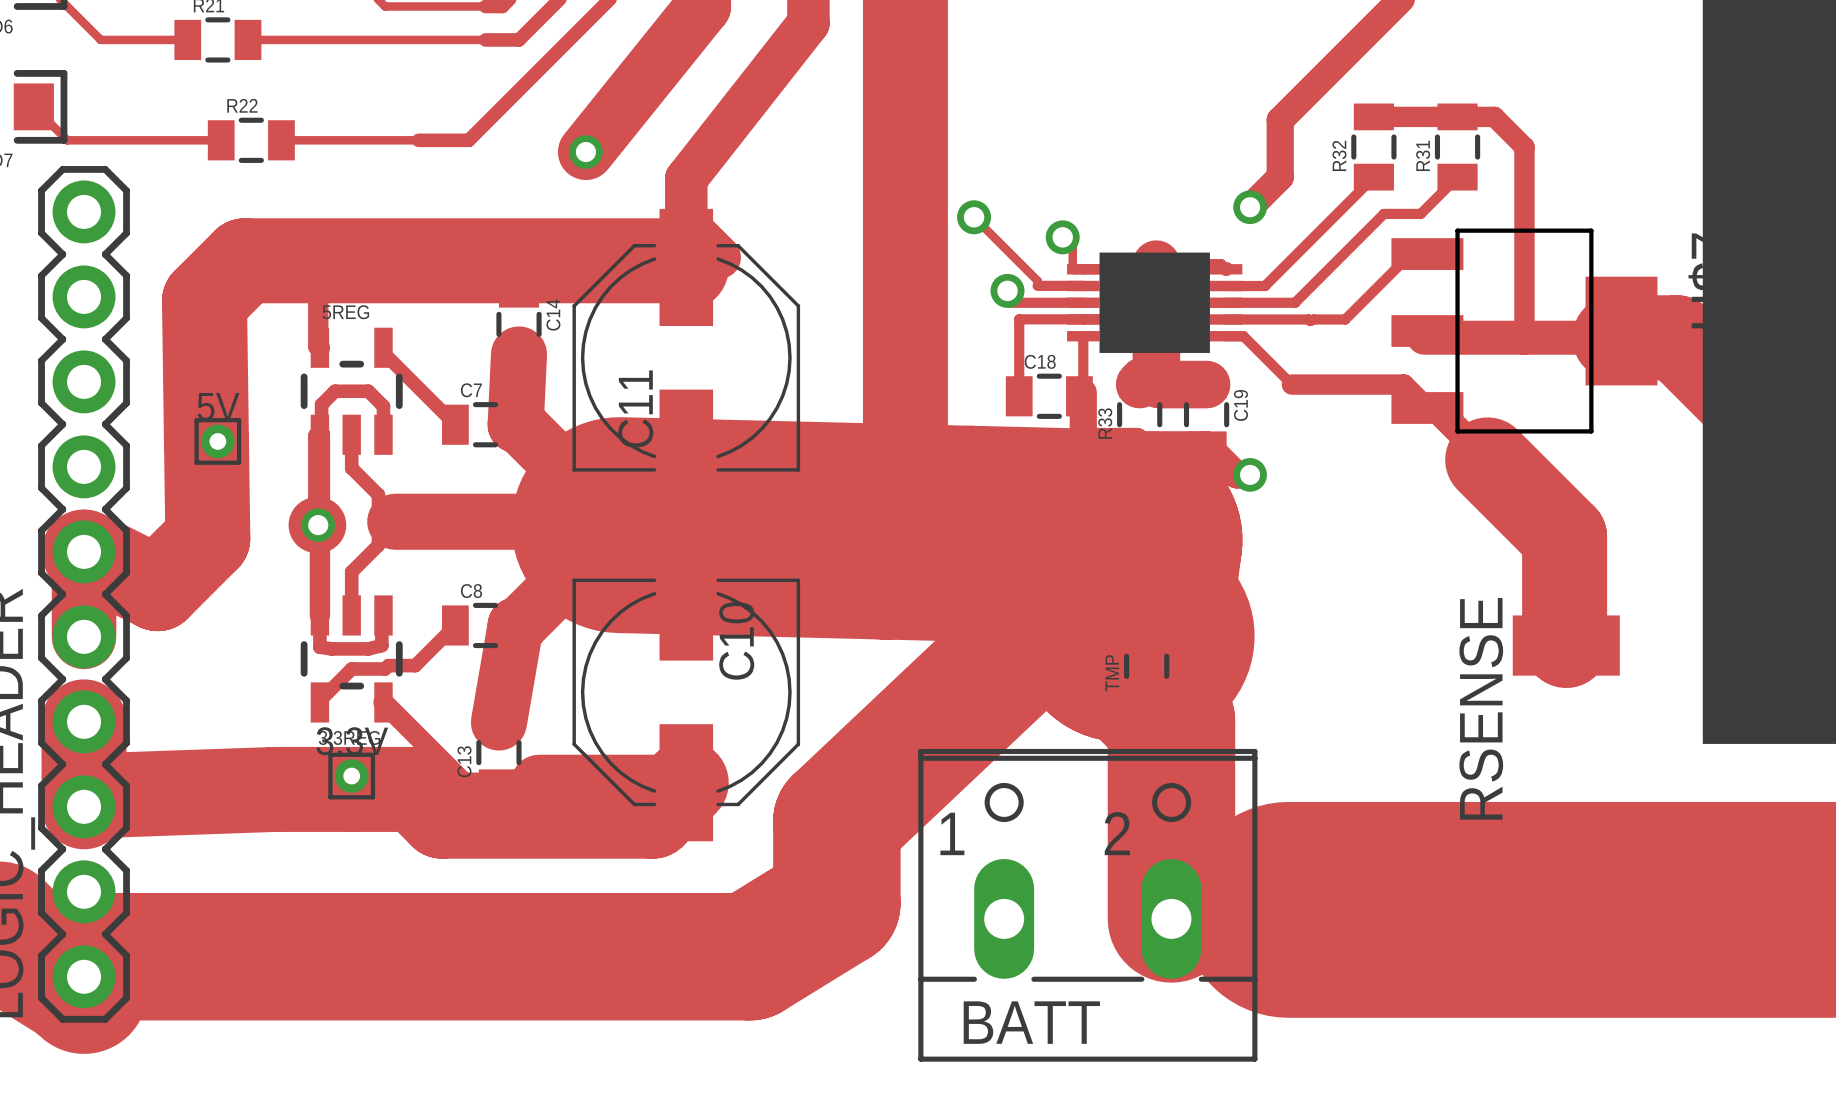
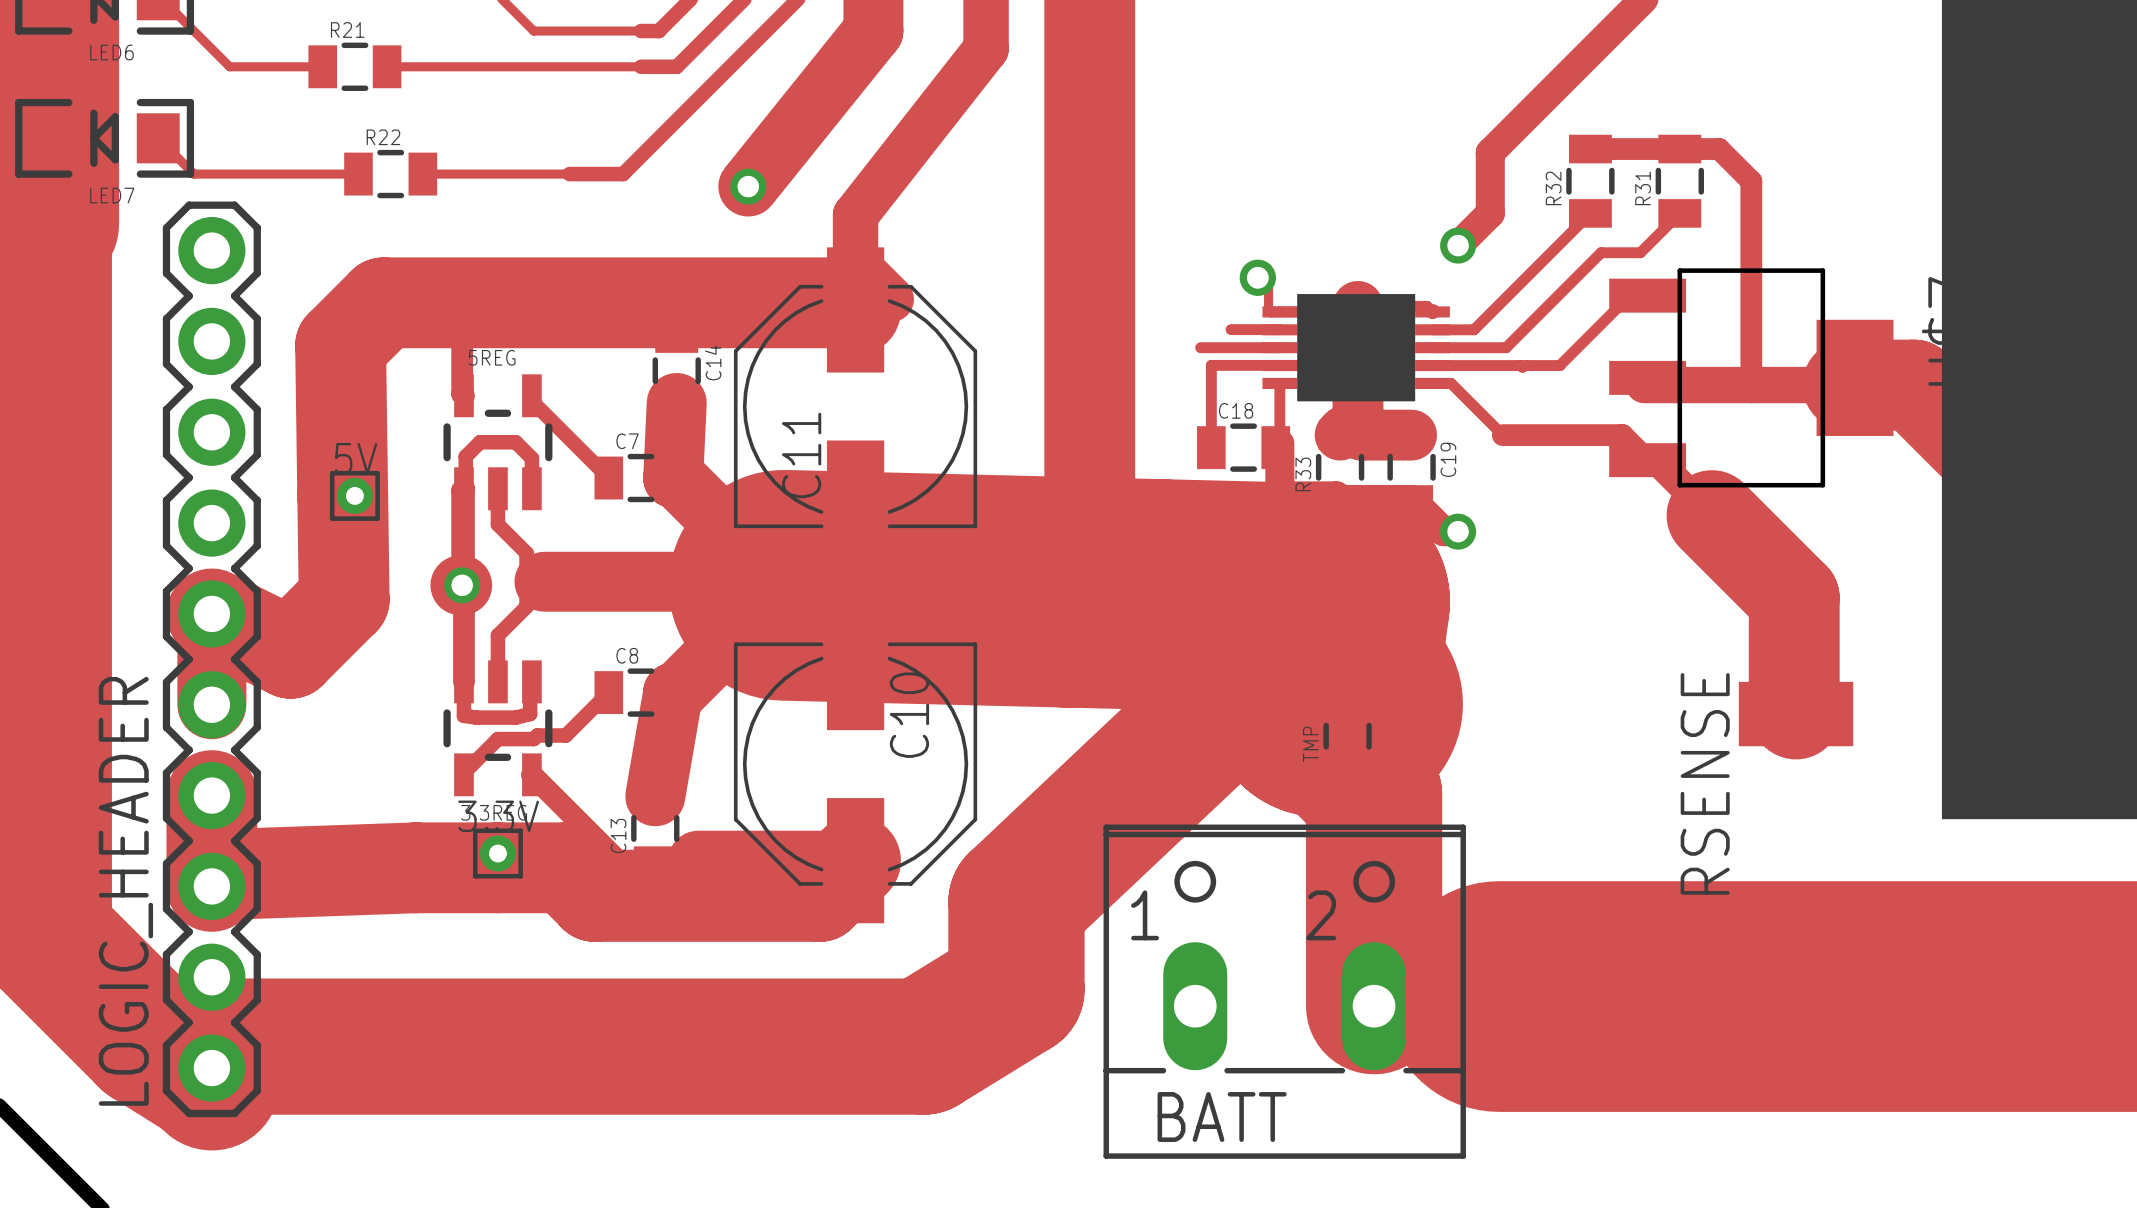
track: (974, 217) (1037, 280) (1037, 285) -> none
via: (974, 217) -> none
via: (1007, 290) -> none

